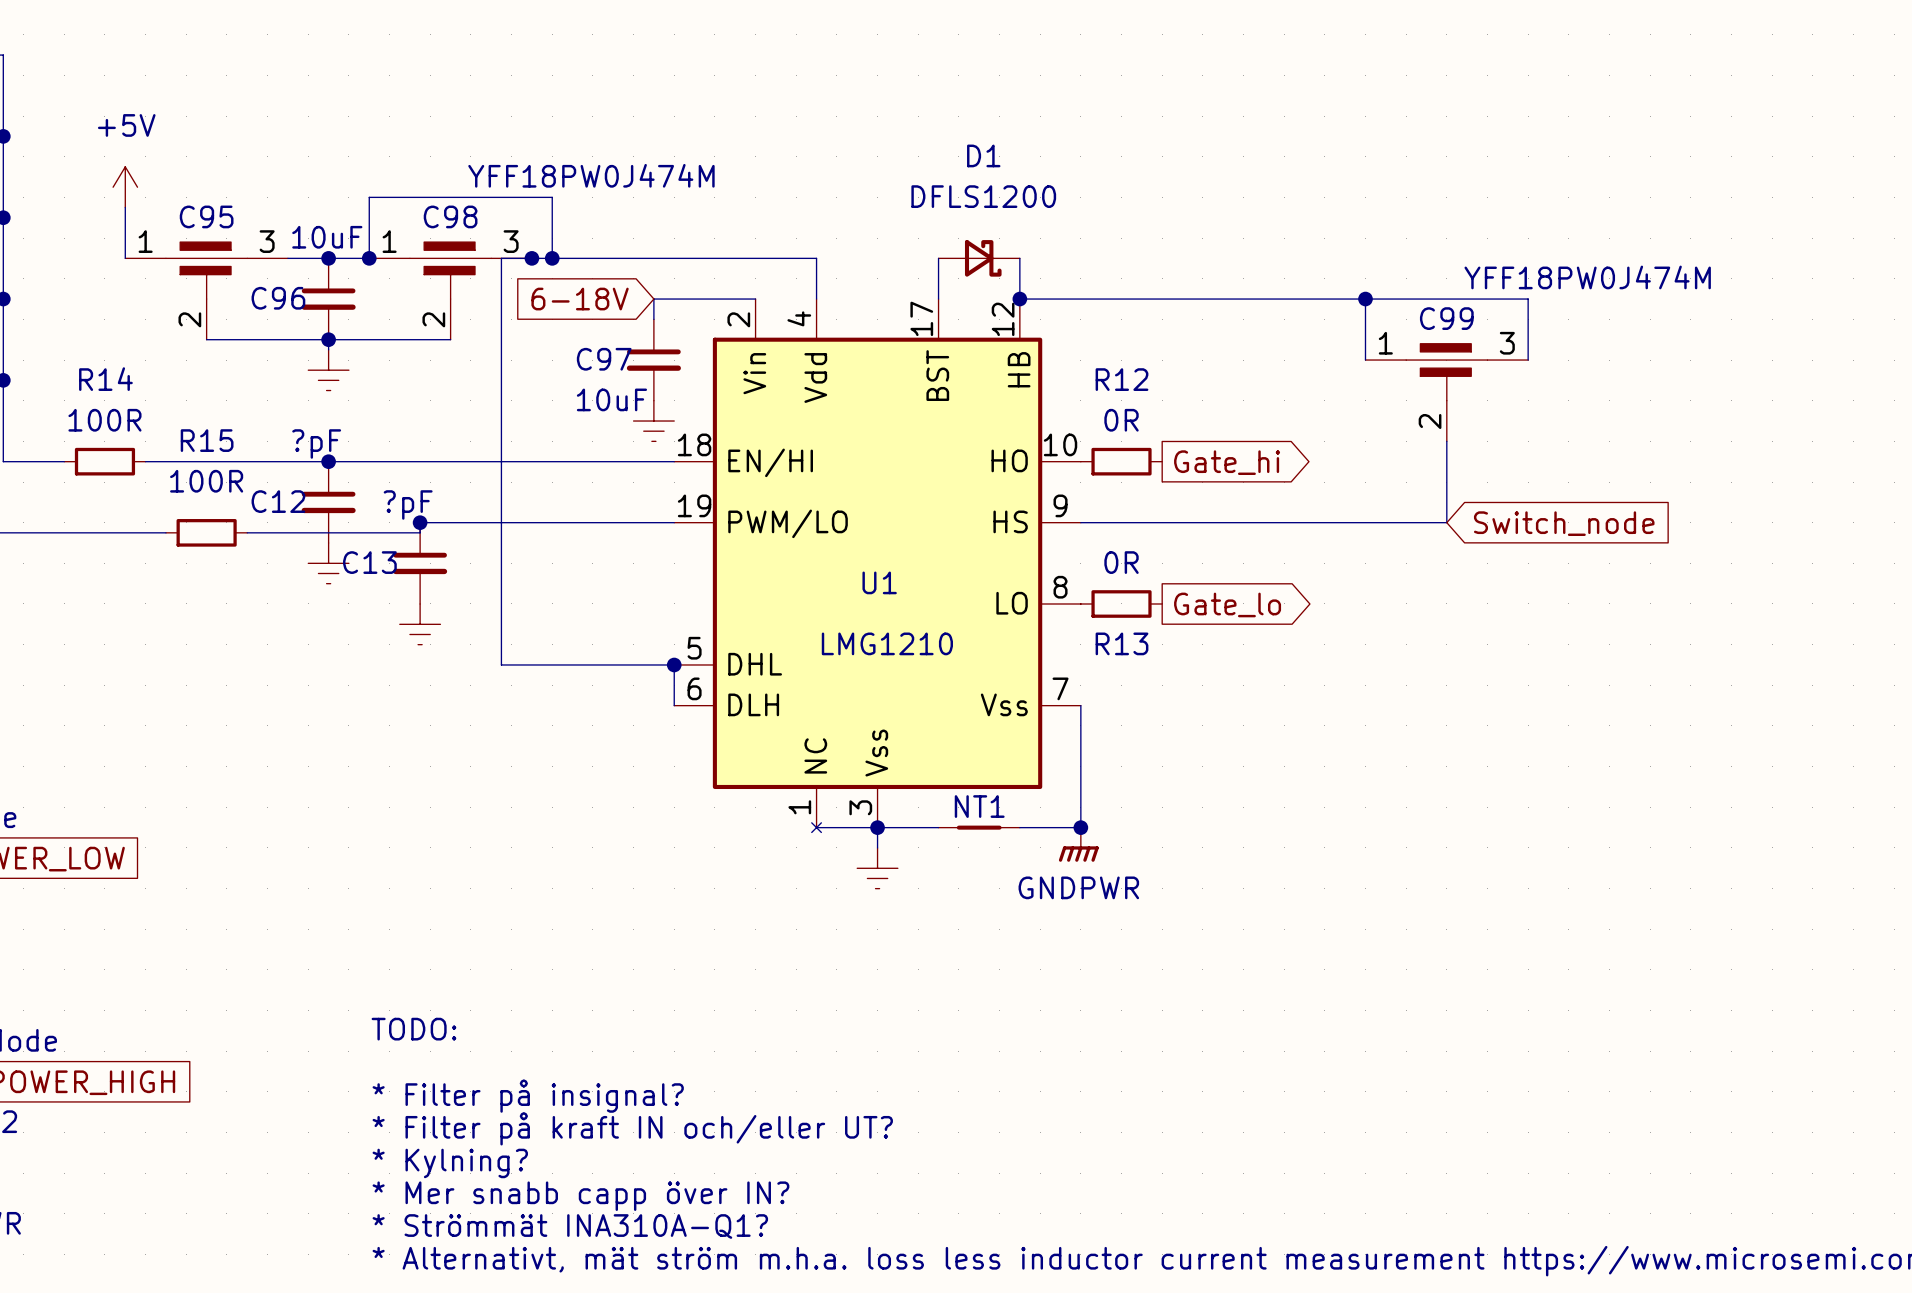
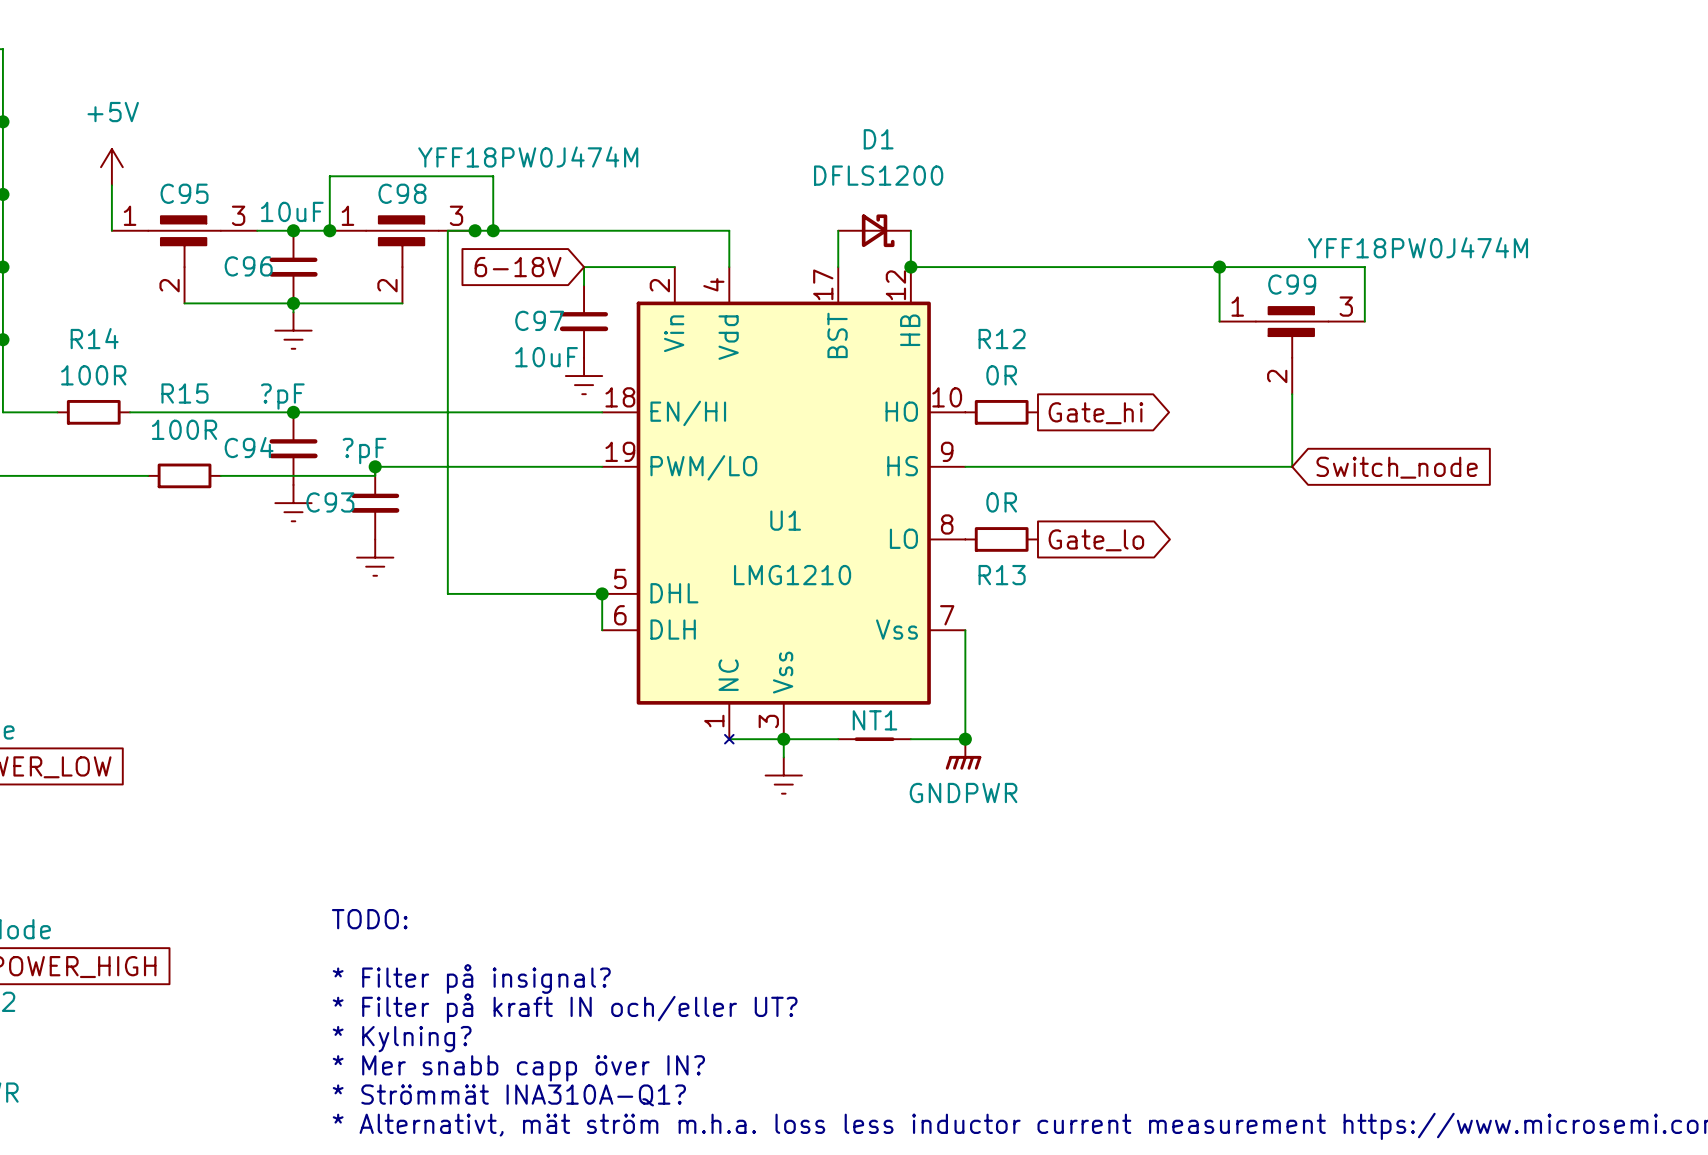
C12 name: C12 (278, 501) -> C94 (249, 447)
C13 name: C13 (369, 562) -> C93 (330, 502)

